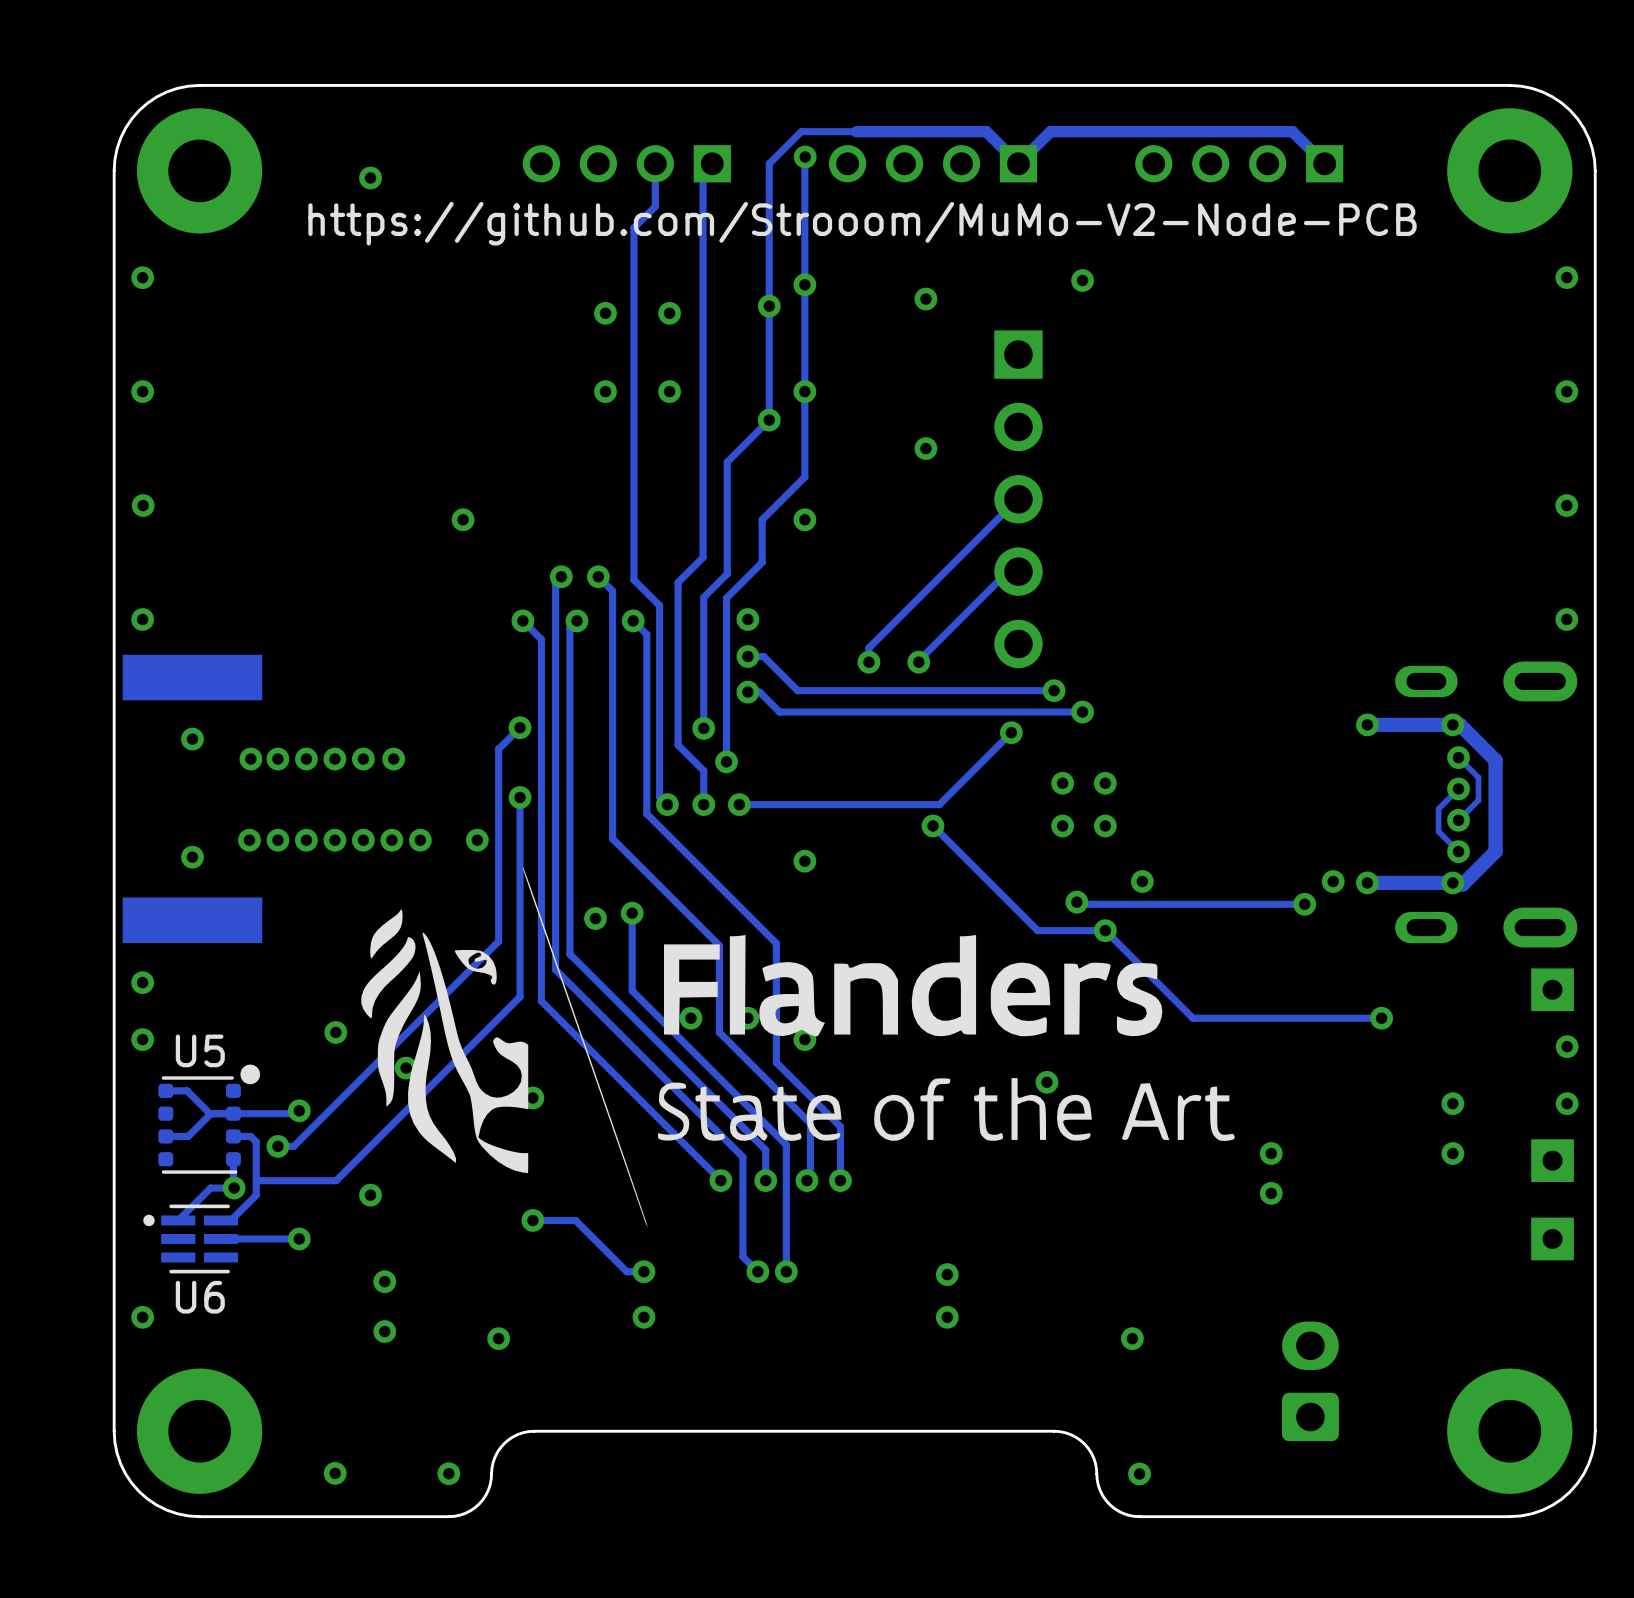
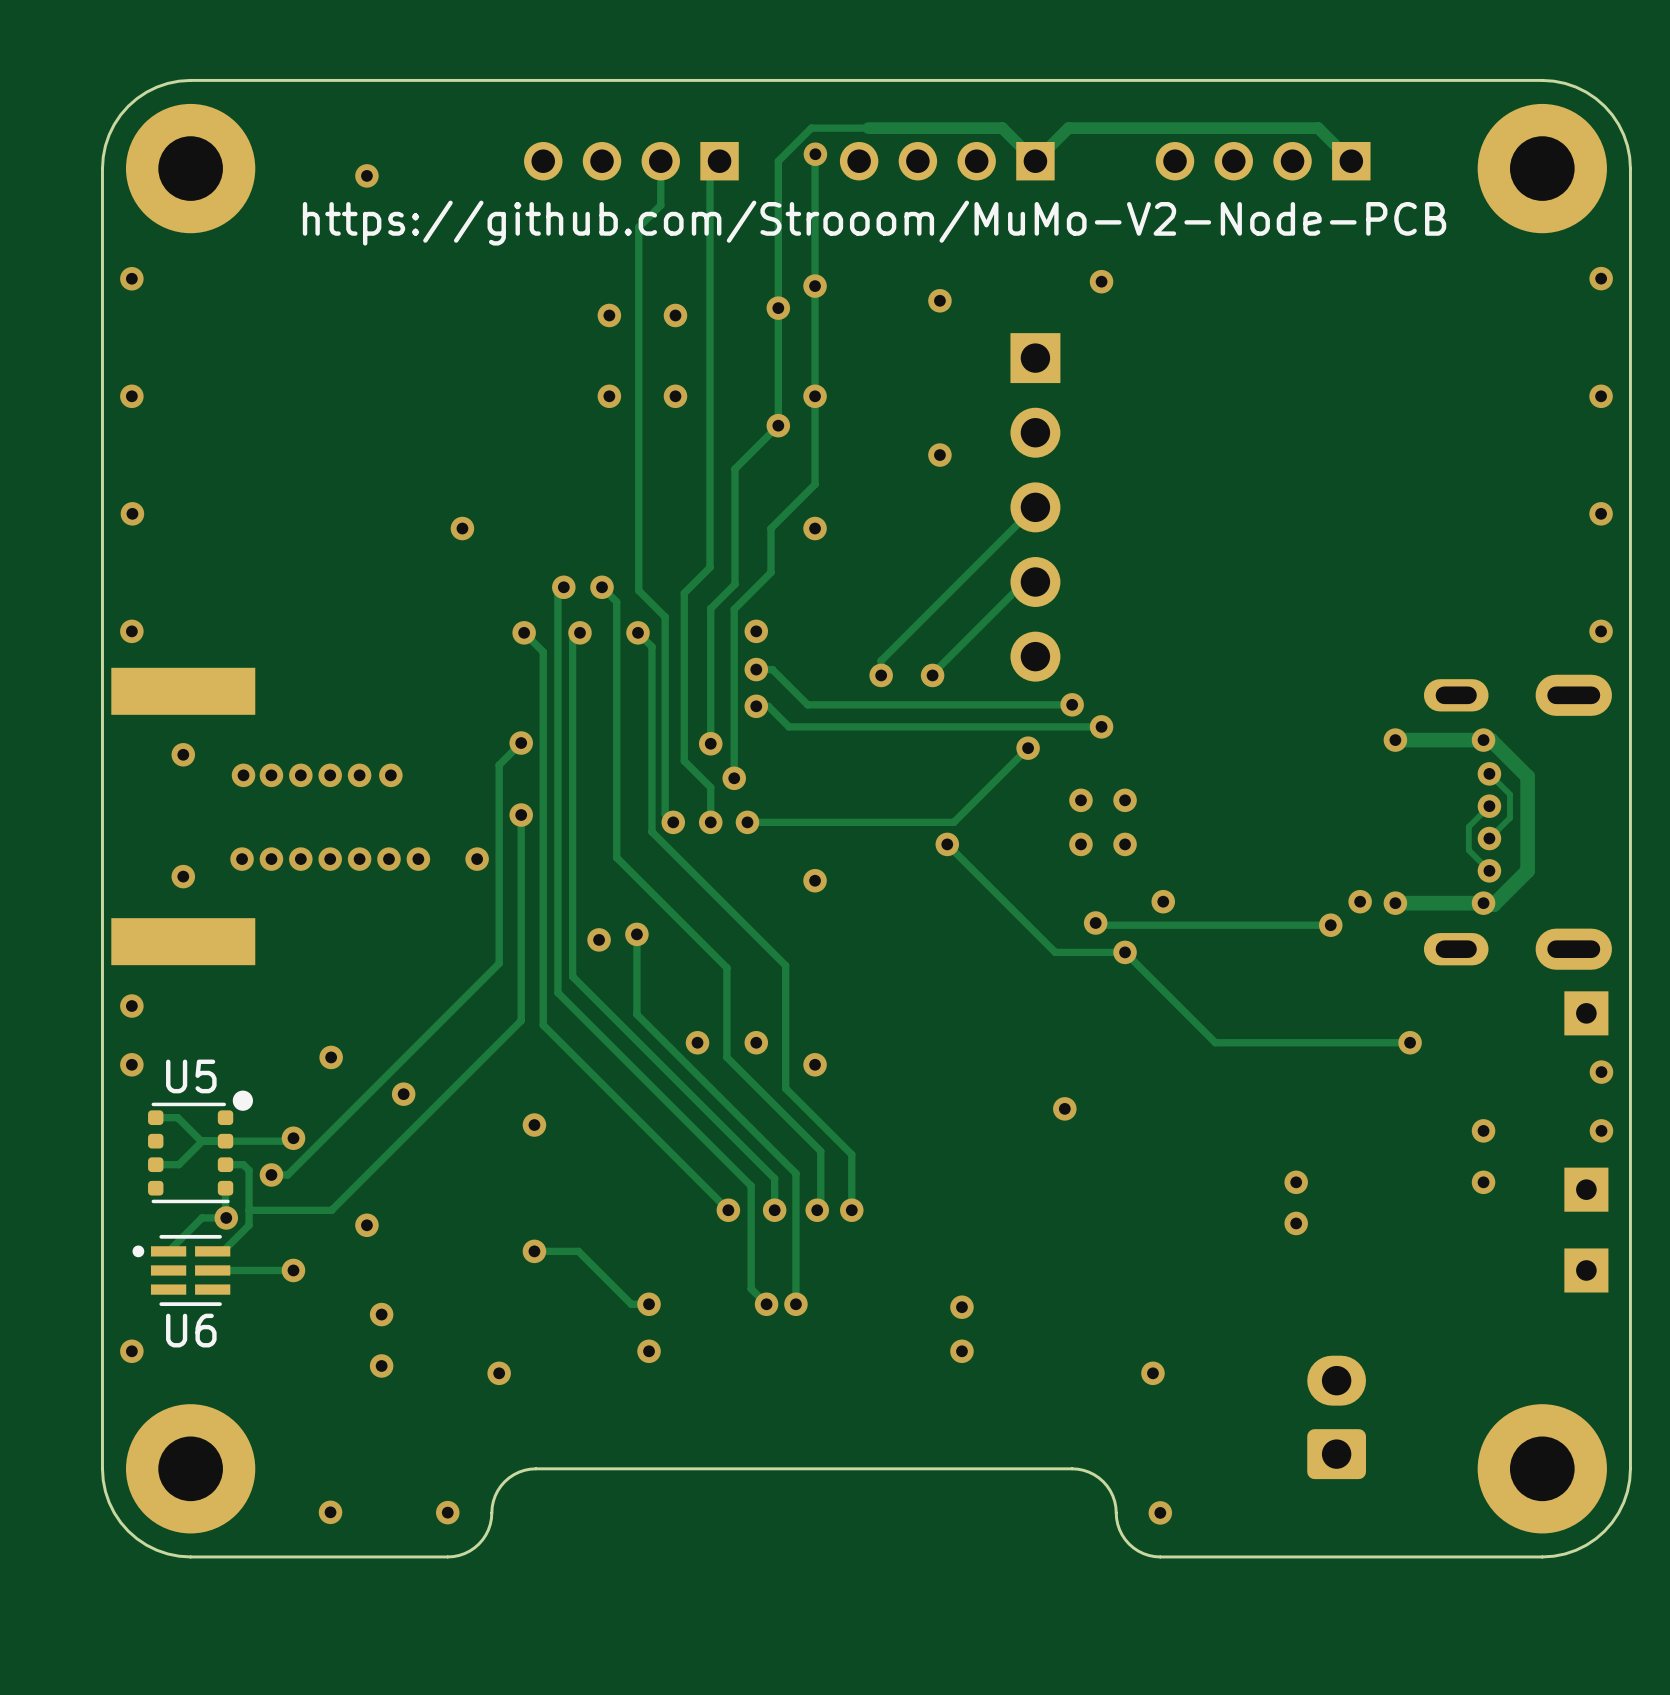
drawing: [361, 867, 1235, 1228] -> none

